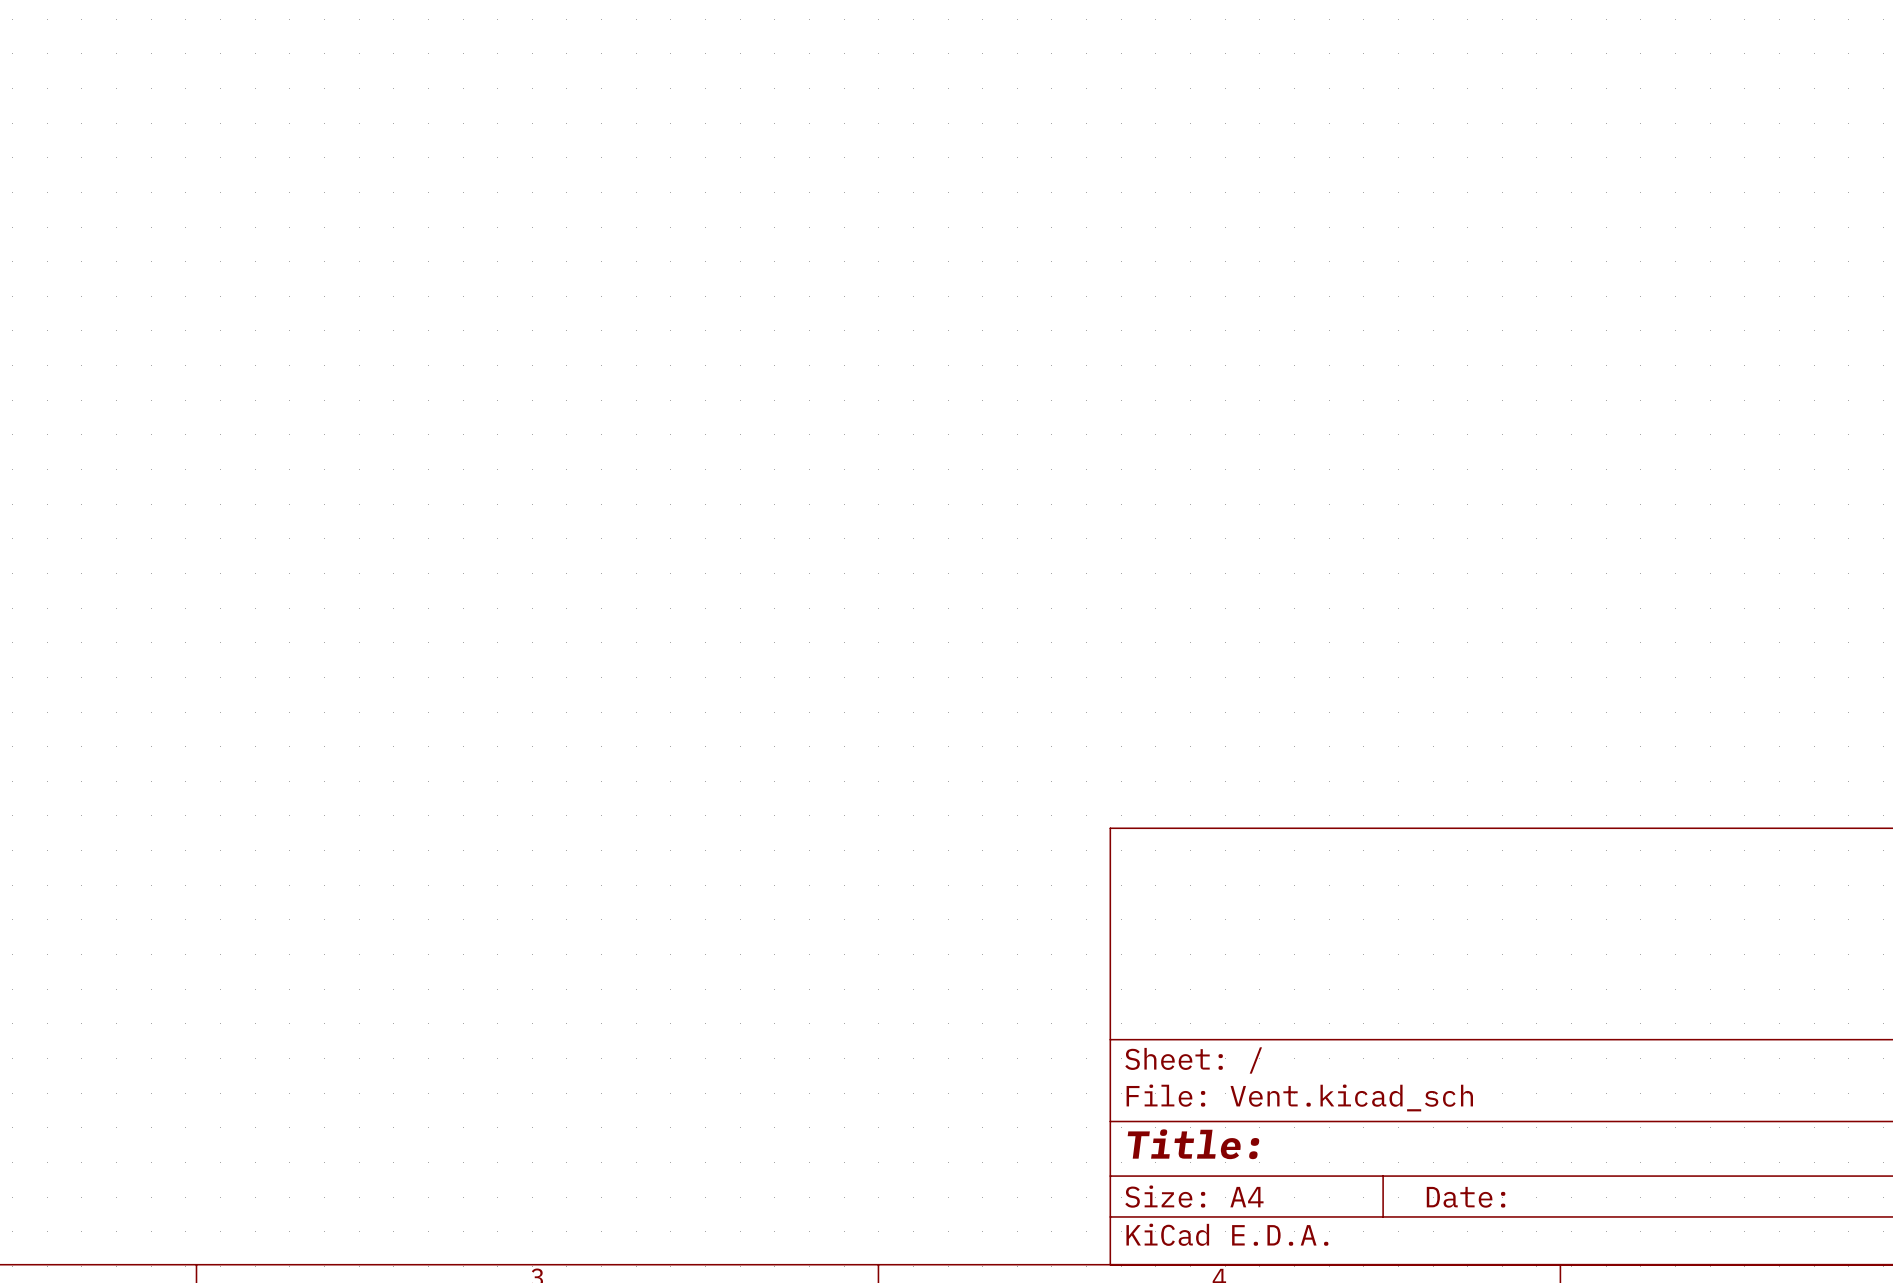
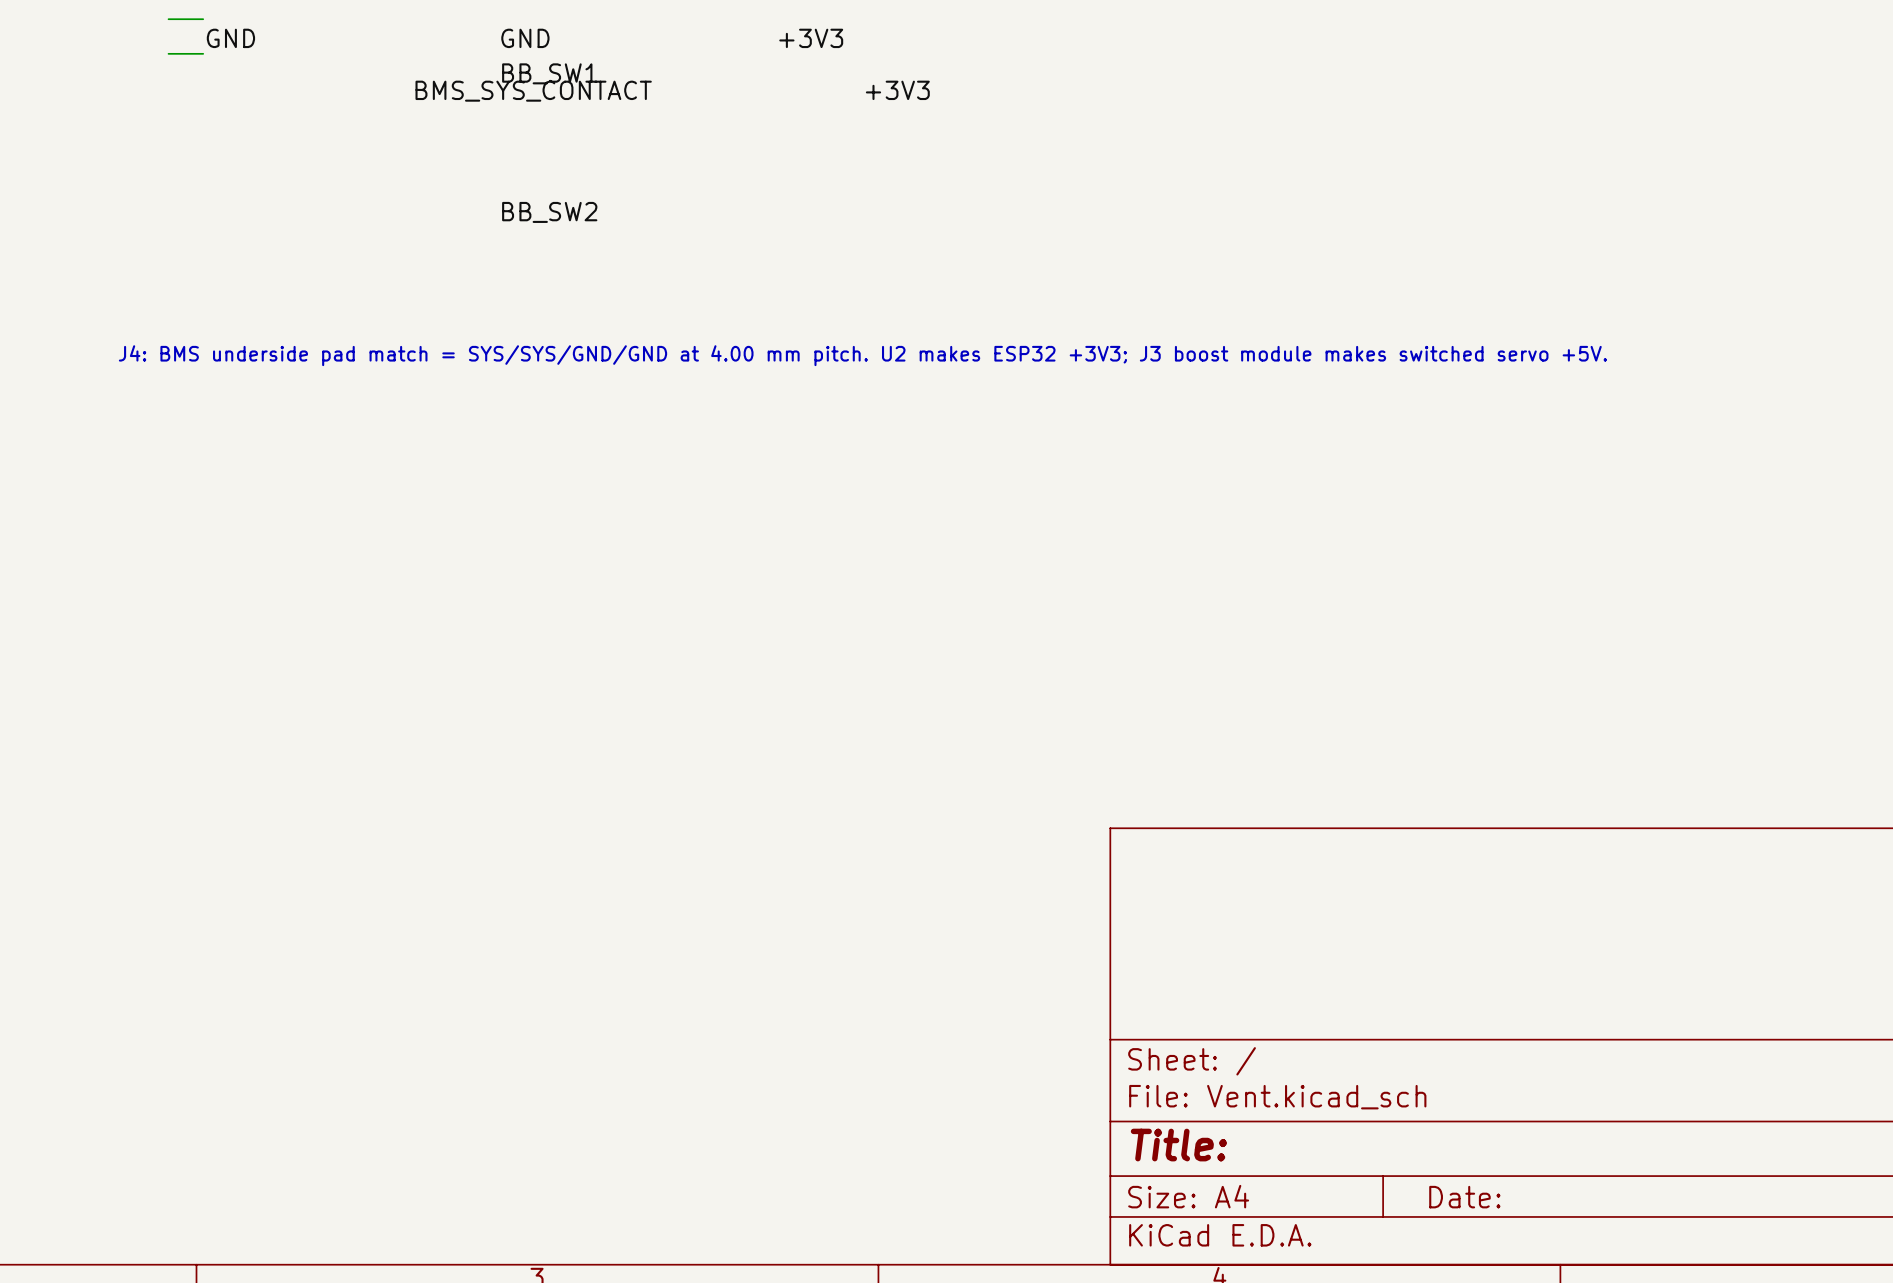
wire: none -> (168, 19) (203, 19)
label: none -> GND (230, 38)
label: none -> GND (525, 38)
label: none -> +3V3 (811, 38)
wire: none -> (168, 53) (203, 53)
label: none -> BB_SW1 (549, 73)
label: none -> +3V3 (897, 90)
label: none -> BMS_SYS_CONTACT (533, 91)
label: none -> BB_SW2 (549, 212)
text: none -> J4: BMS underside pad match = SYS/SYS/GND/GND at 4.00 mm pitch. U2 makes ESP32 +3V3; J3 boost module makes switched servo +5V. (862, 355)

